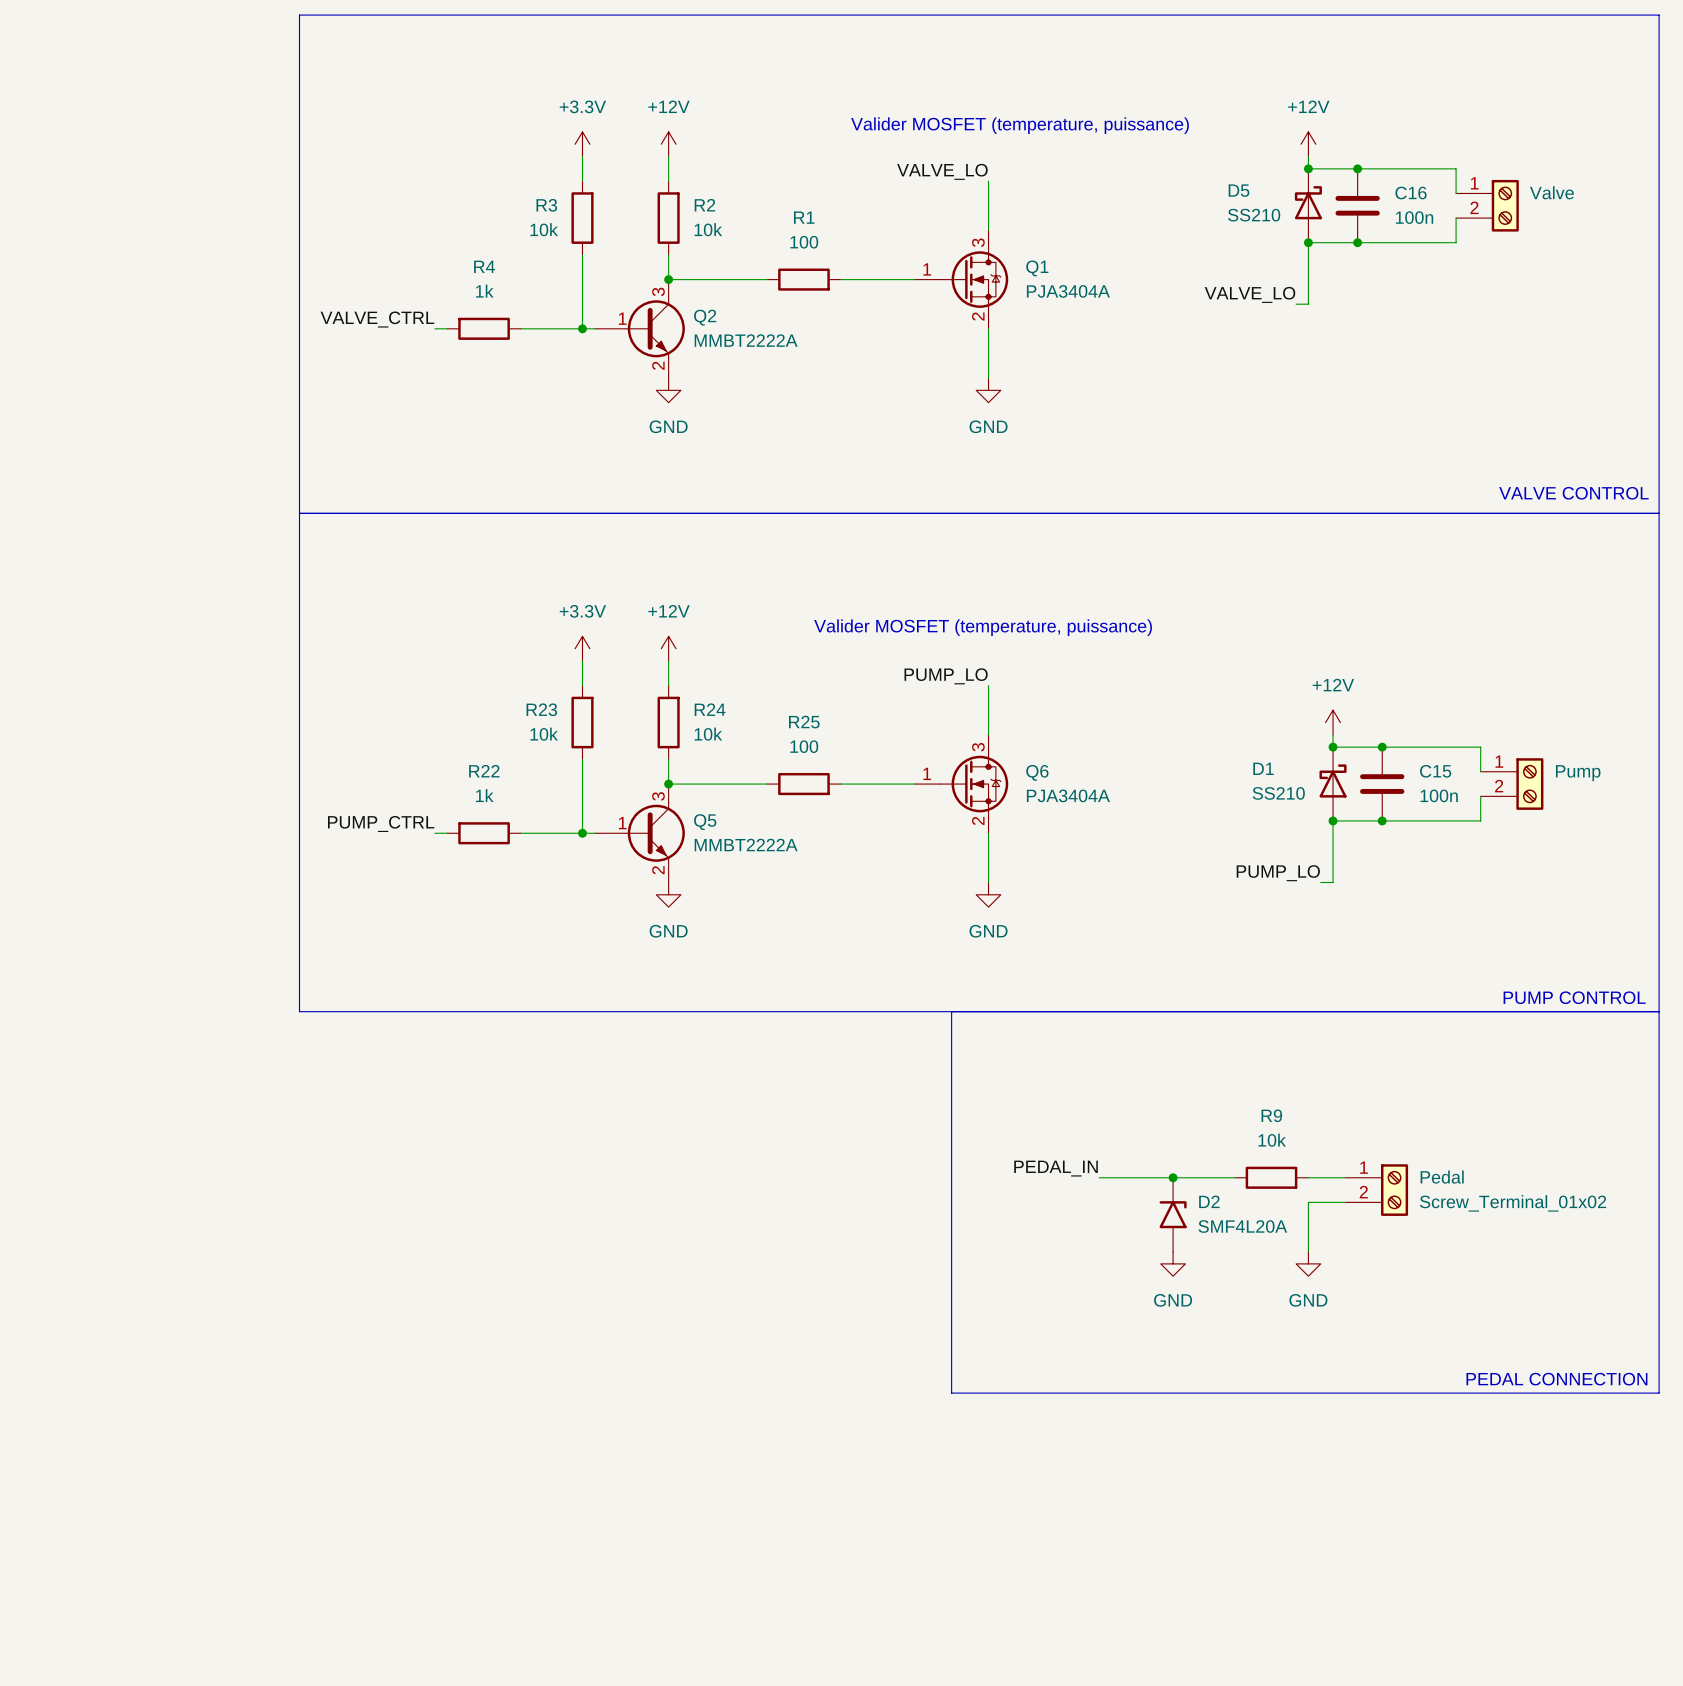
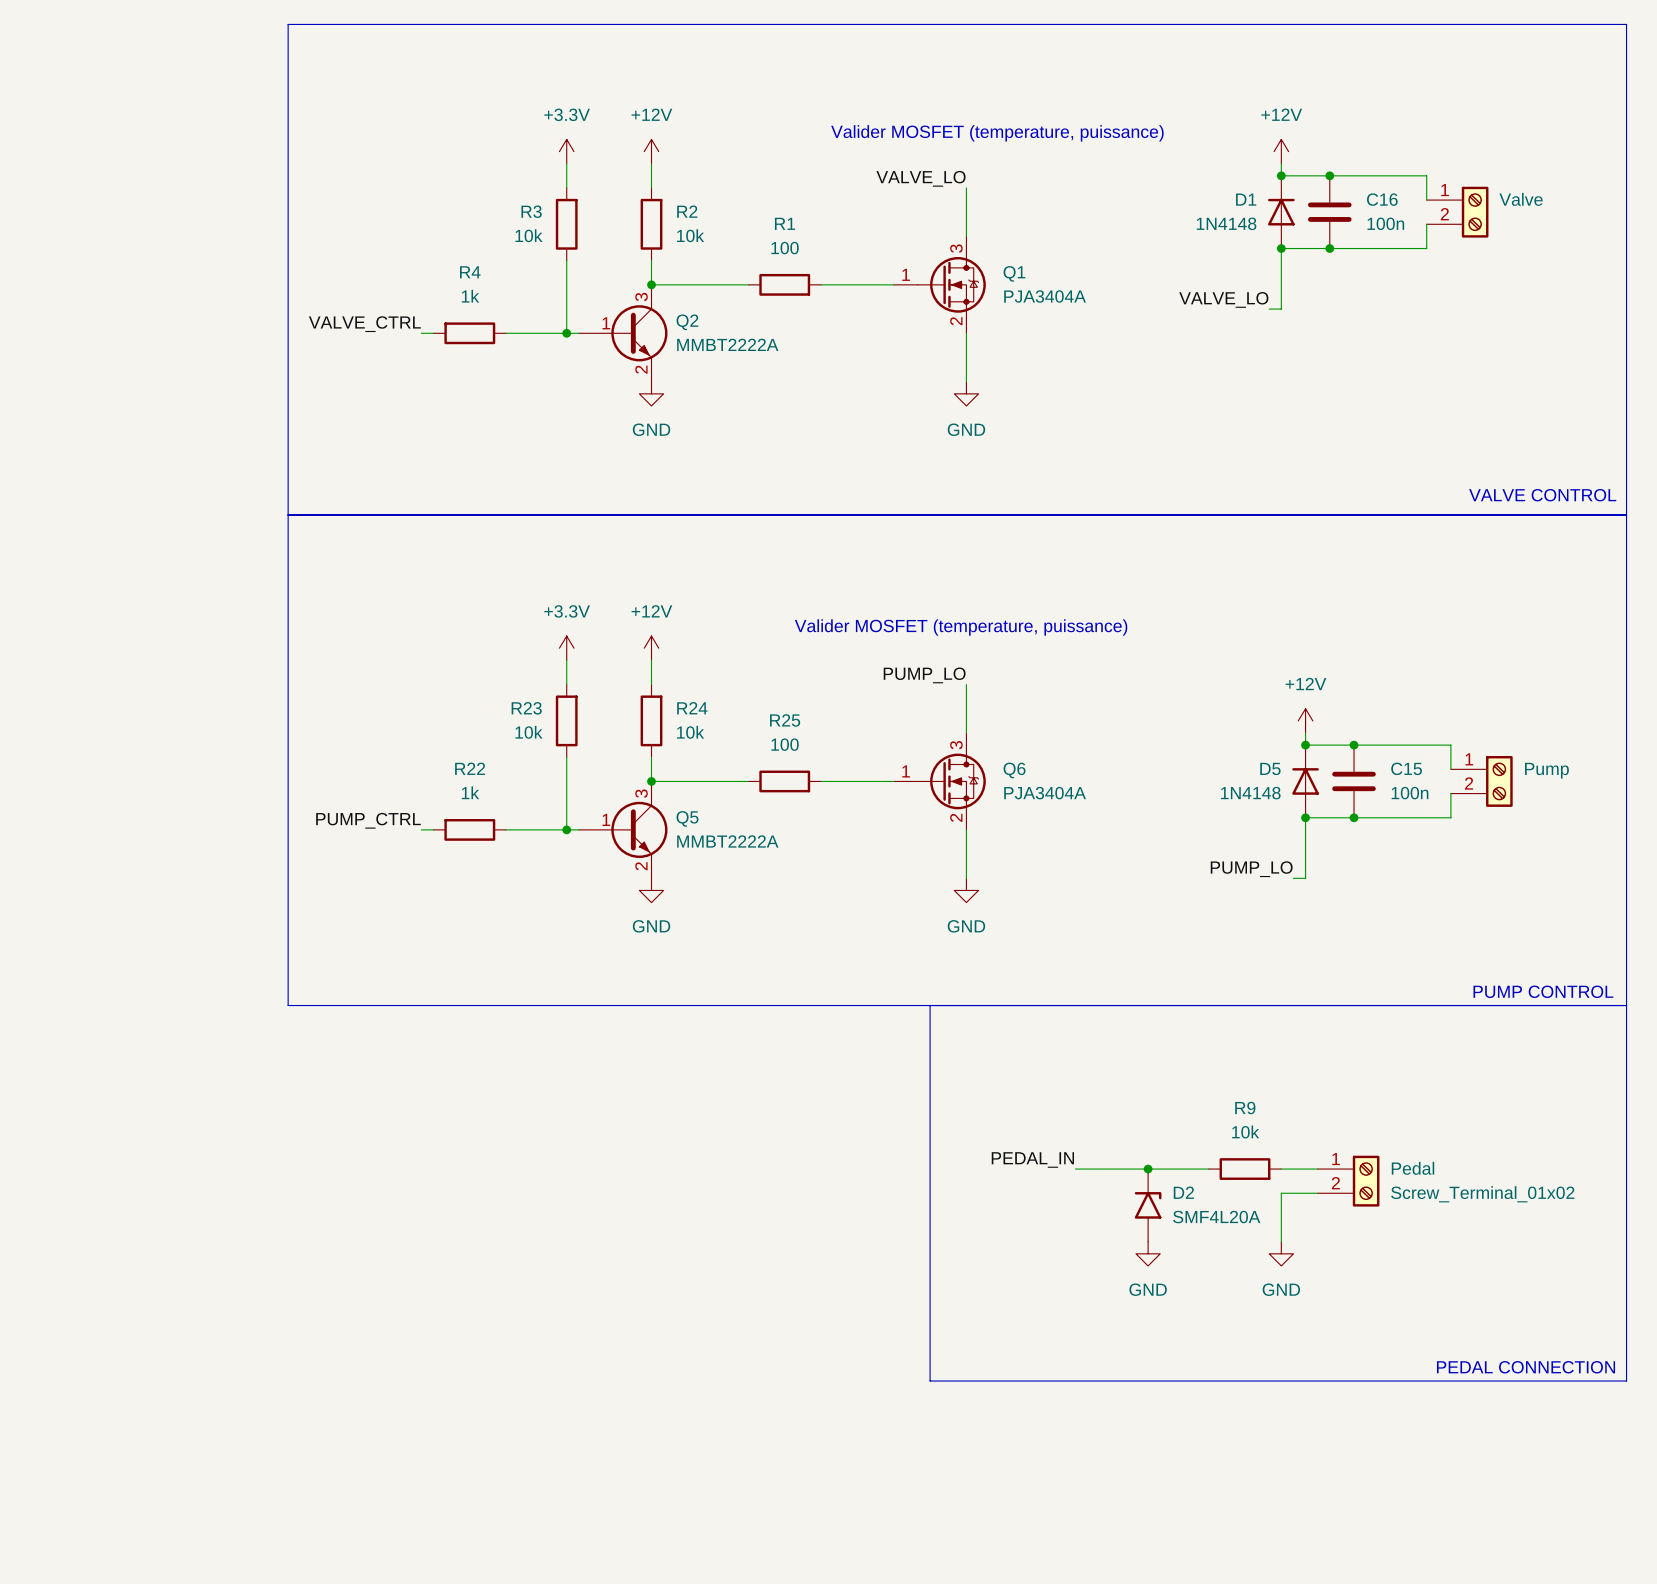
D5 symbol: [1294, 168, 1322, 243] -> [1292, 745, 1319, 818]
D5 name position: D5 (1239, 190) -> D5 (1270, 768)
D5 value: SS210 (1254, 215) -> 1N4148 (1250, 793)
D1 symbol: [1319, 747, 1347, 821] -> [1268, 175, 1295, 249]
D1 name position: D1 (1263, 768) -> D1 (1246, 199)
D1 value: SS210 (1278, 793) -> 1N4148 (1226, 223)

